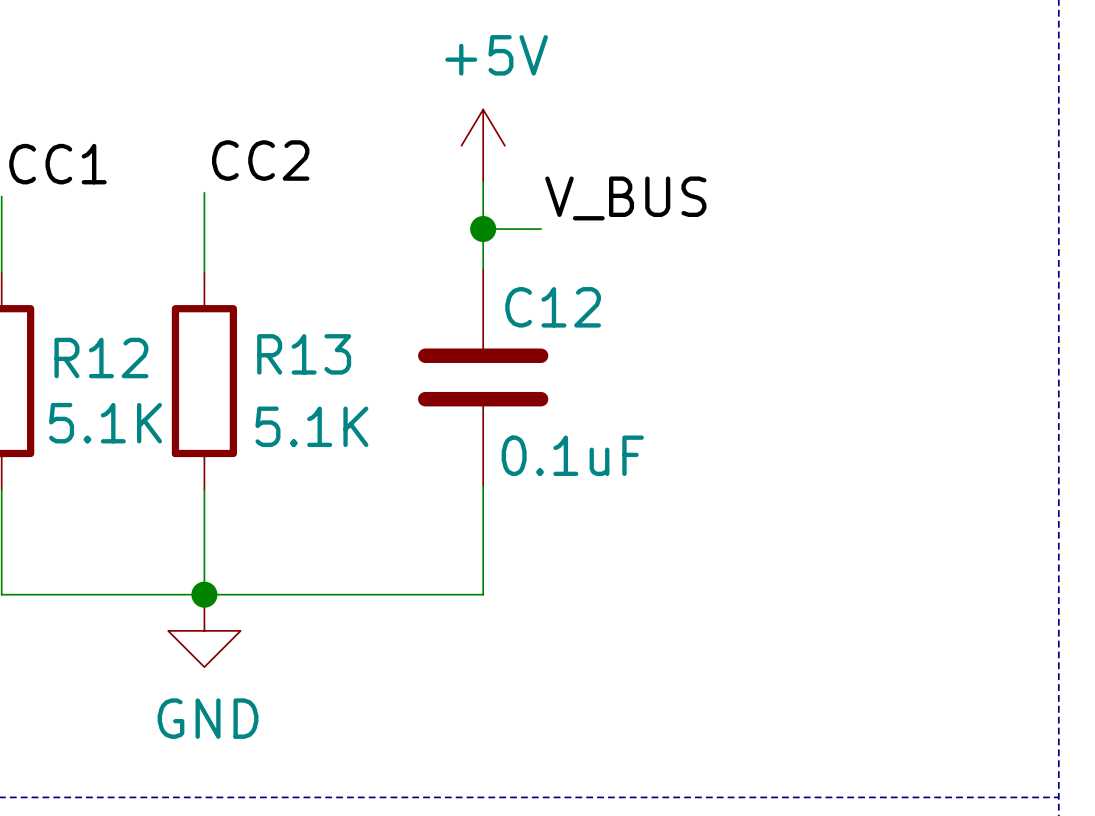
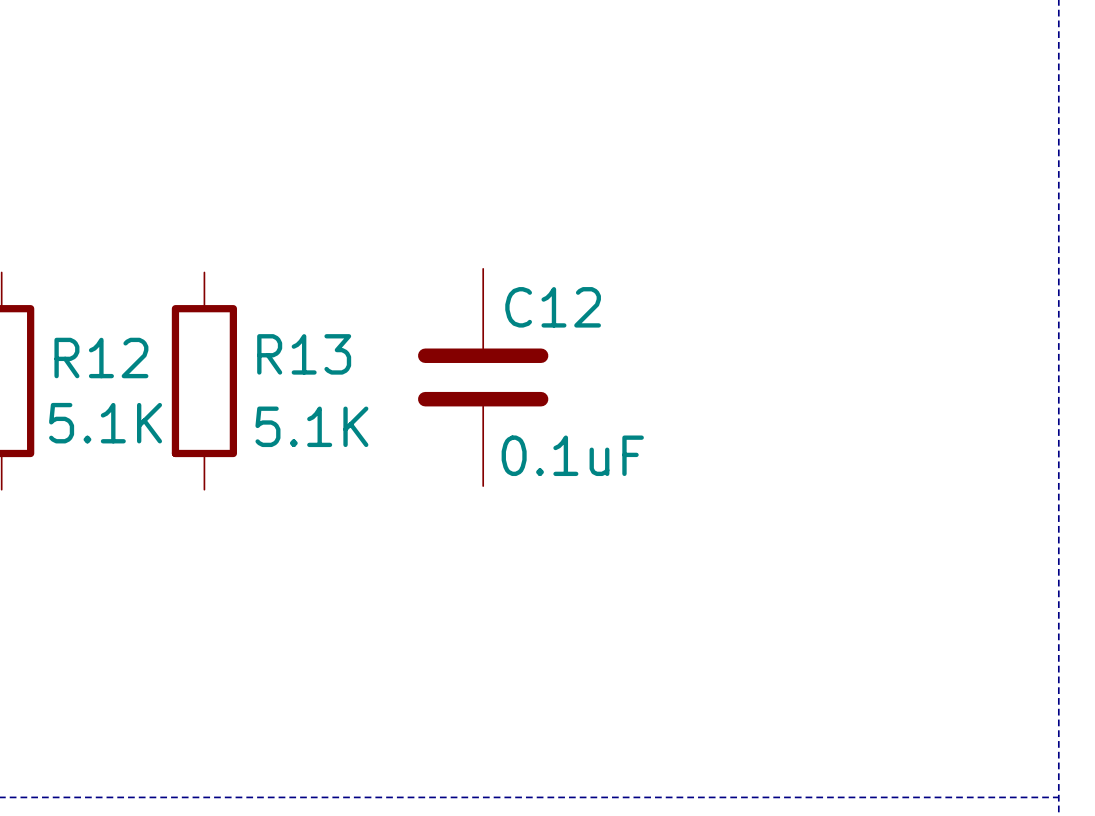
power symbol: +5V (483, 145) -> none
label: CC2 (260, 160) -> none
label: CC1 (57, 164) -> none
wire: (483, 181) (483, 268) -> none
wire: (204, 192) (204, 272) -> none
wire: (1, 196) (1, 272) -> none
label: V_BUS (625, 198) -> none
wire: (483, 229) (541, 229) -> none
junction: (483, 229) -> none
wire: (483, 486) (483, 594) (1, 594) (1, 489) -> none
wire: (204, 489) (204, 594) -> none
junction: (204, 594) -> none
power symbol: GND (204, 630) -> none

